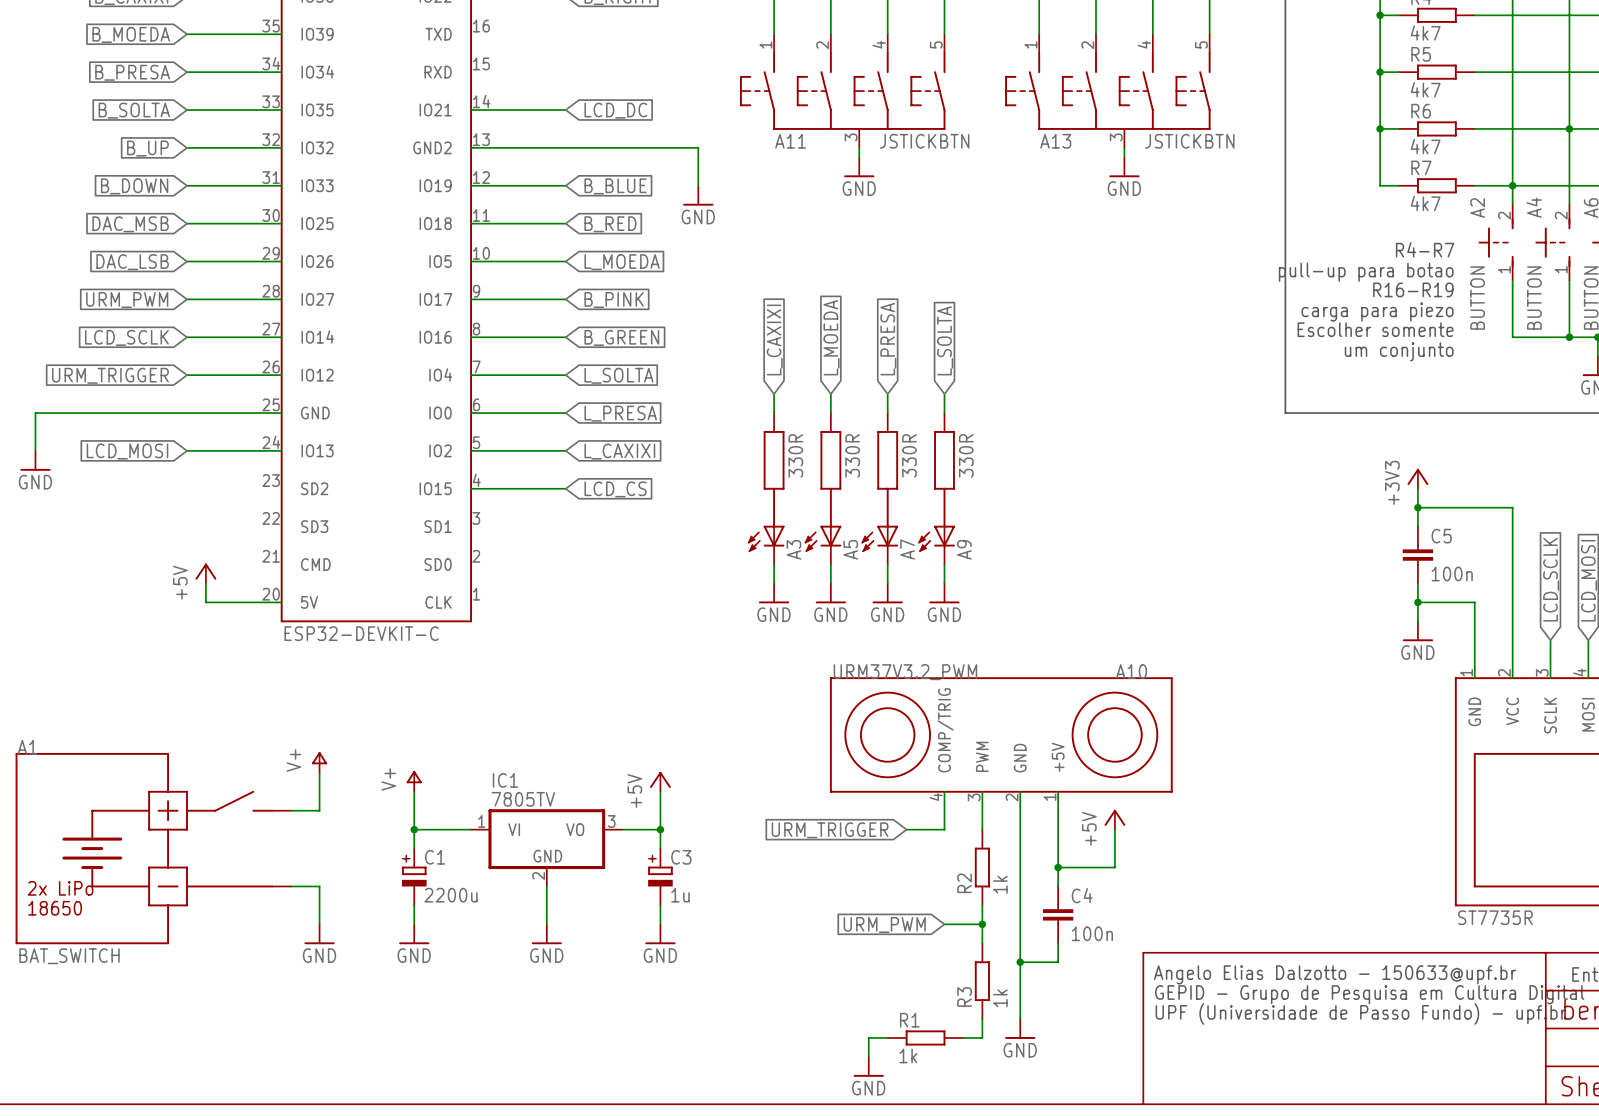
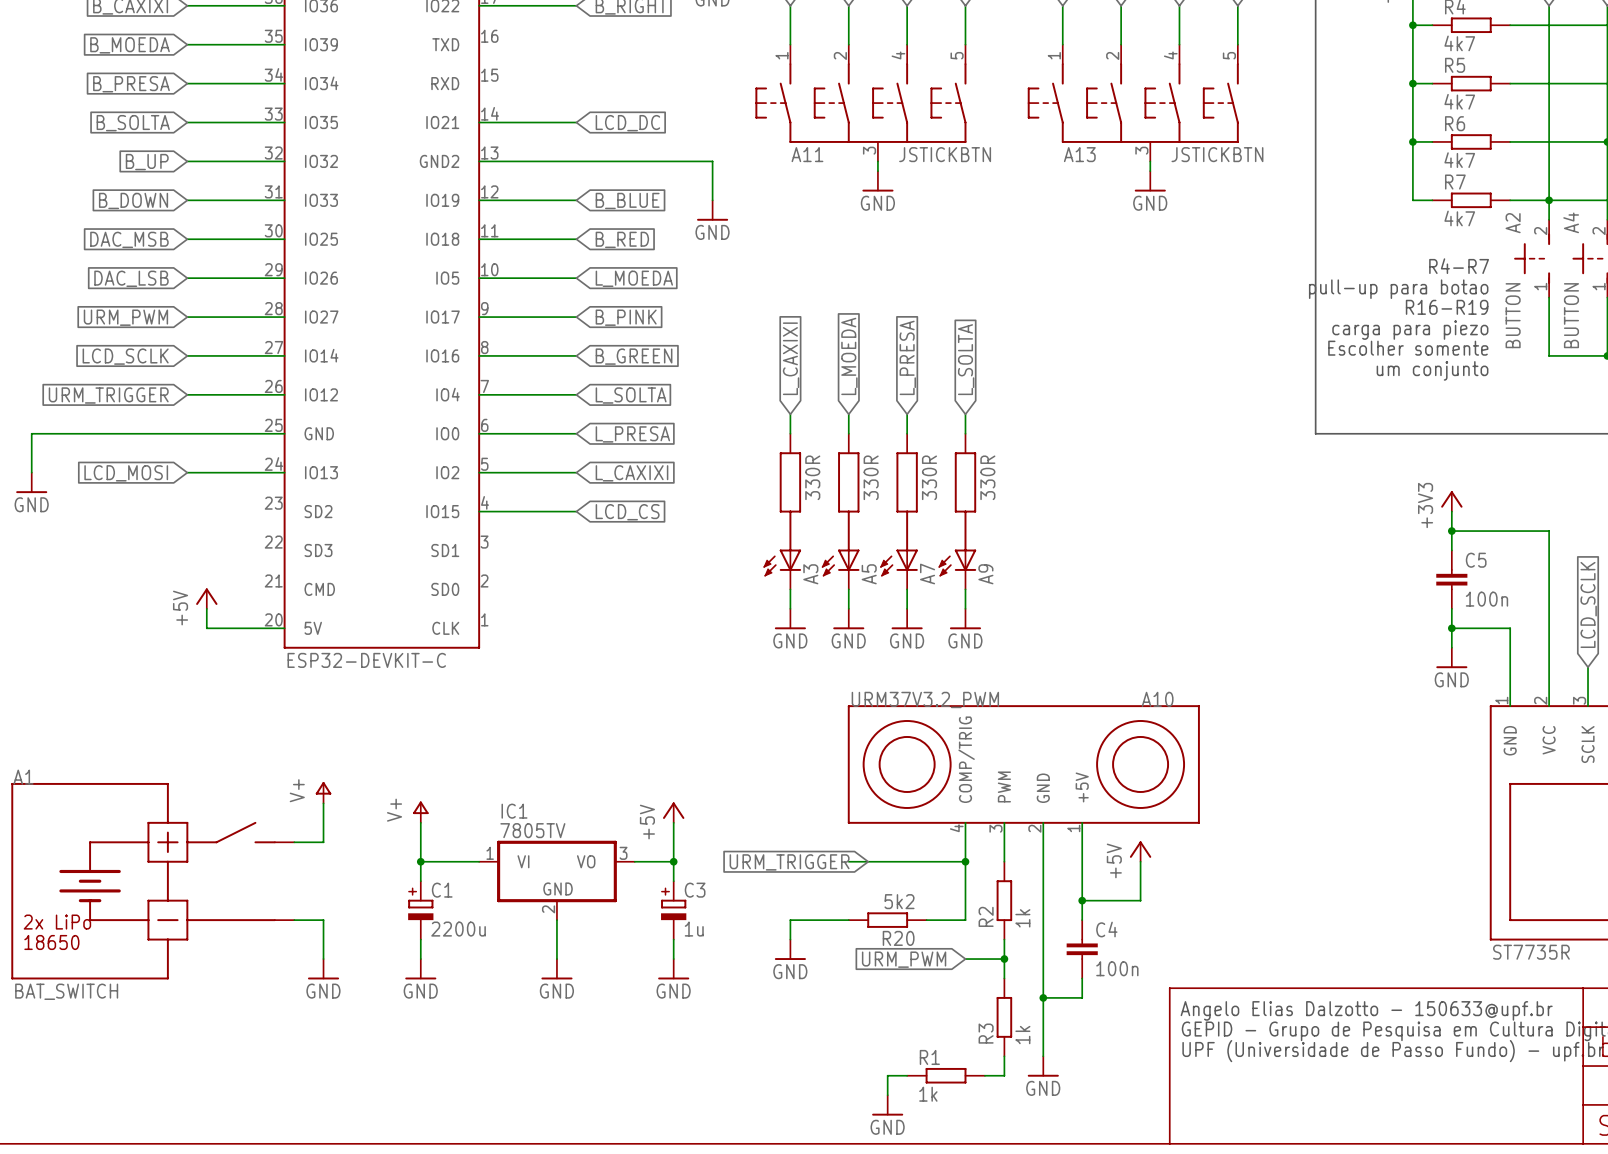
wire: none -> (848, 861) (926, 861)
wire: none -> (965, 861) (965, 920) (926, 920)
junction: none -> (965, 861)
global label position: URM_TRIGGER (830, 830) -> URM_TRIGGER (789, 862)
wire: none -> (848, 920) (790, 920) (790, 939)
R20: none -> 5k2 (887, 920)
power symbol: none -> GND (790, 949)

